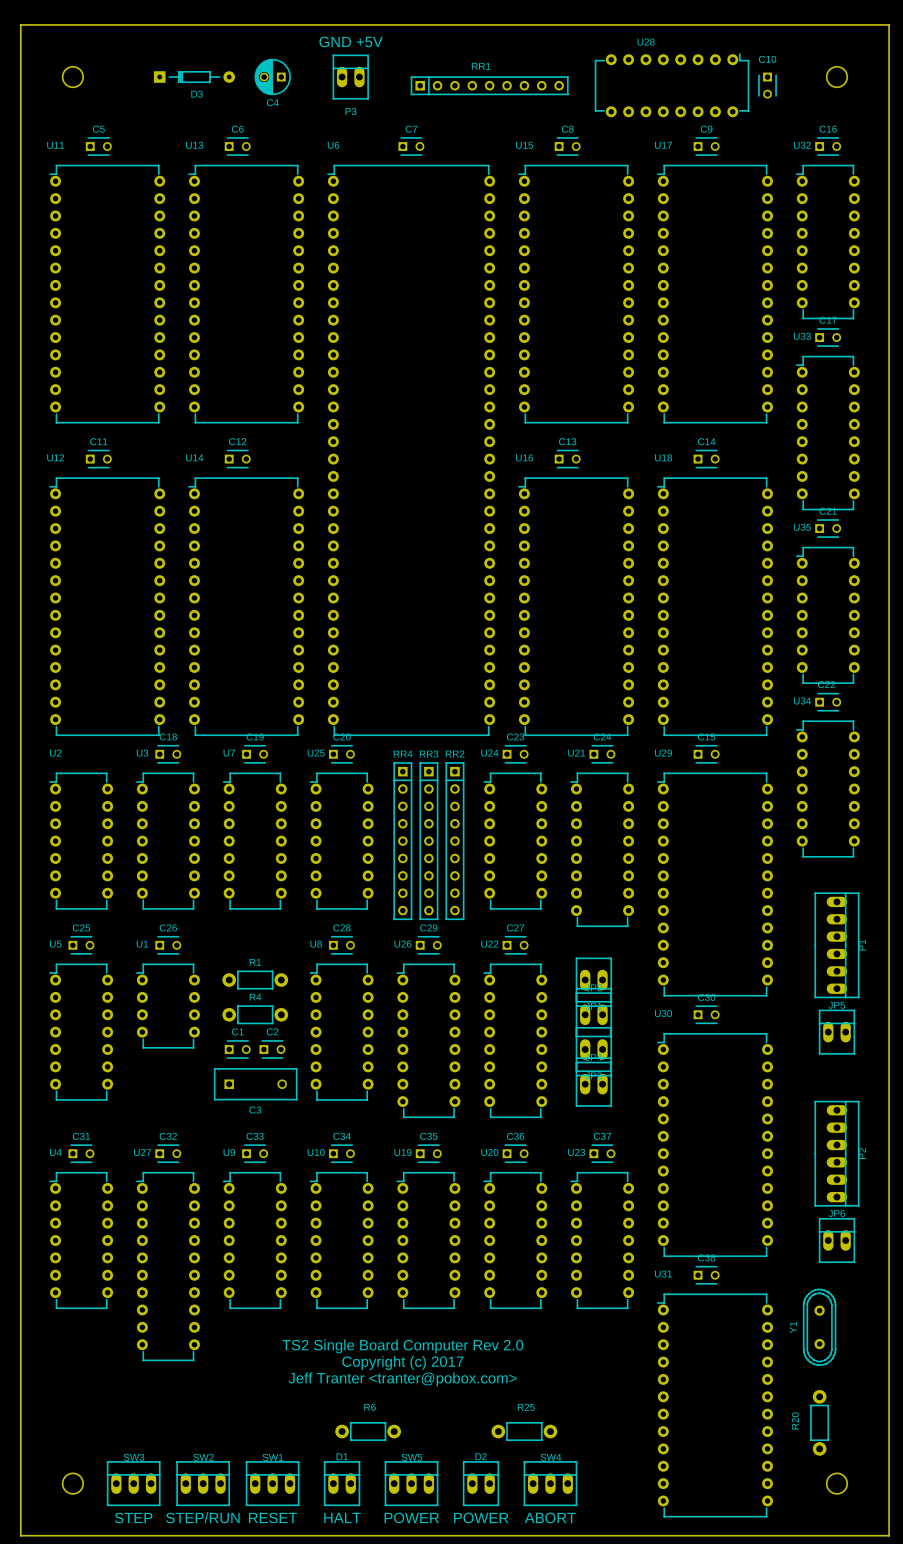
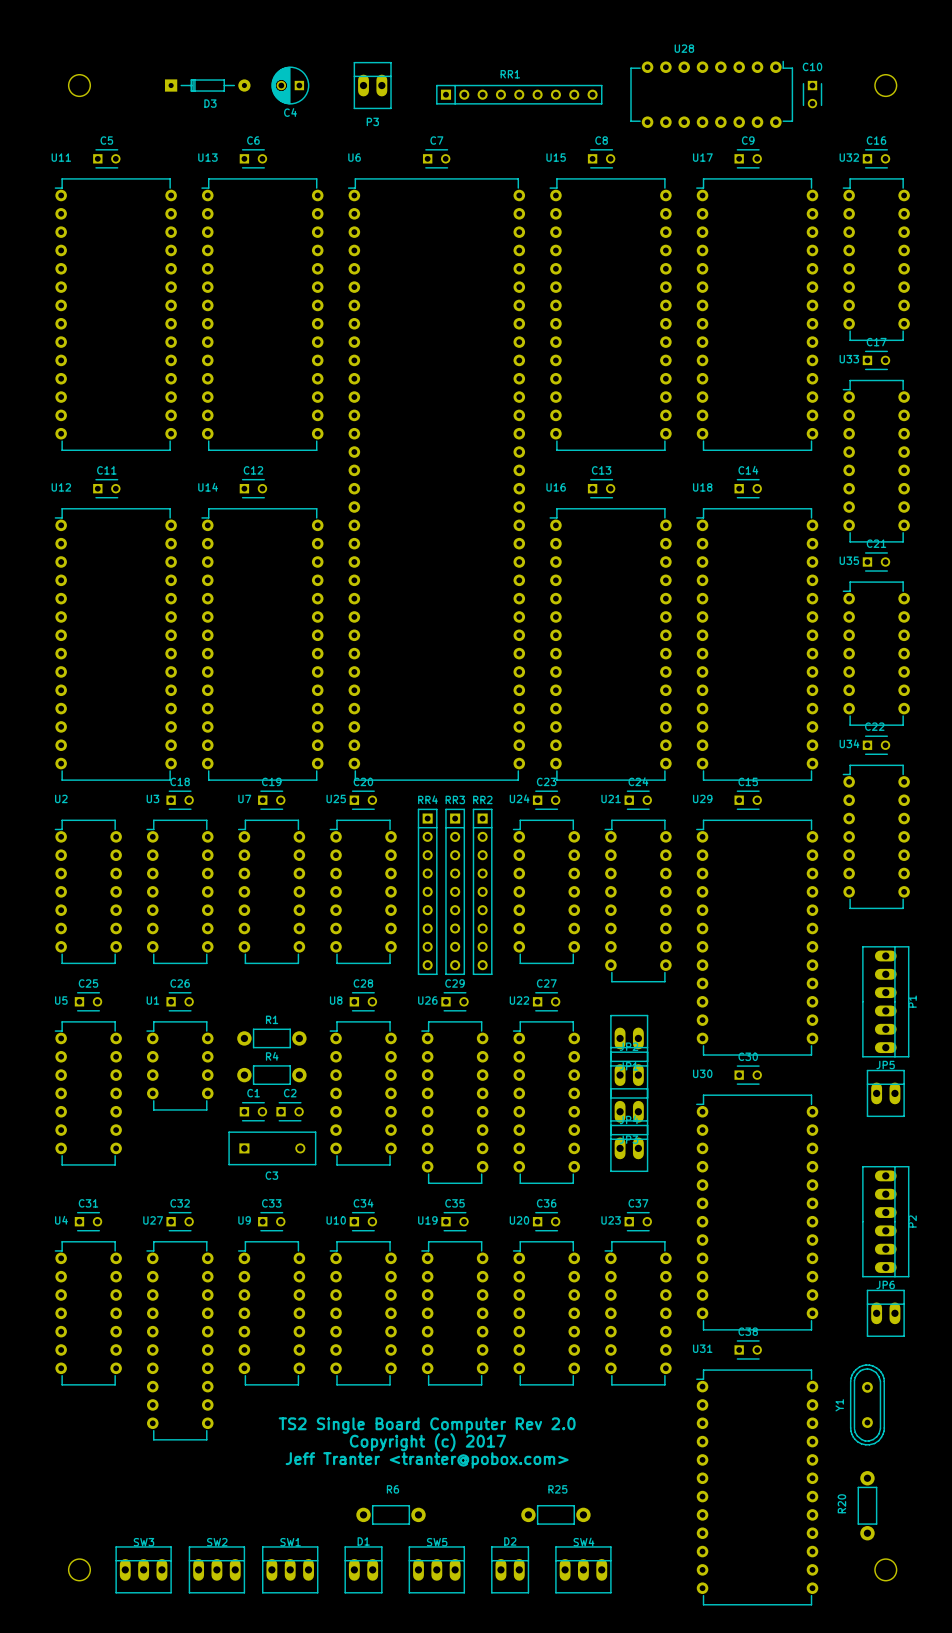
board edge: (20, 24) (20, 1535) (889, 1535) (889, 24) (20, 24) -> none
text: GND +5V (351, 41) -> none
text: STEP (133, 1517) -> none
text: STEP/RUN (202, 1517) -> none
text: RESET (273, 1517) -> none
text: HALT (342, 1517) -> none
text: POWER (411, 1517) -> none
text: POWER (481, 1517) -> none
text: ABORT (550, 1517) -> none

